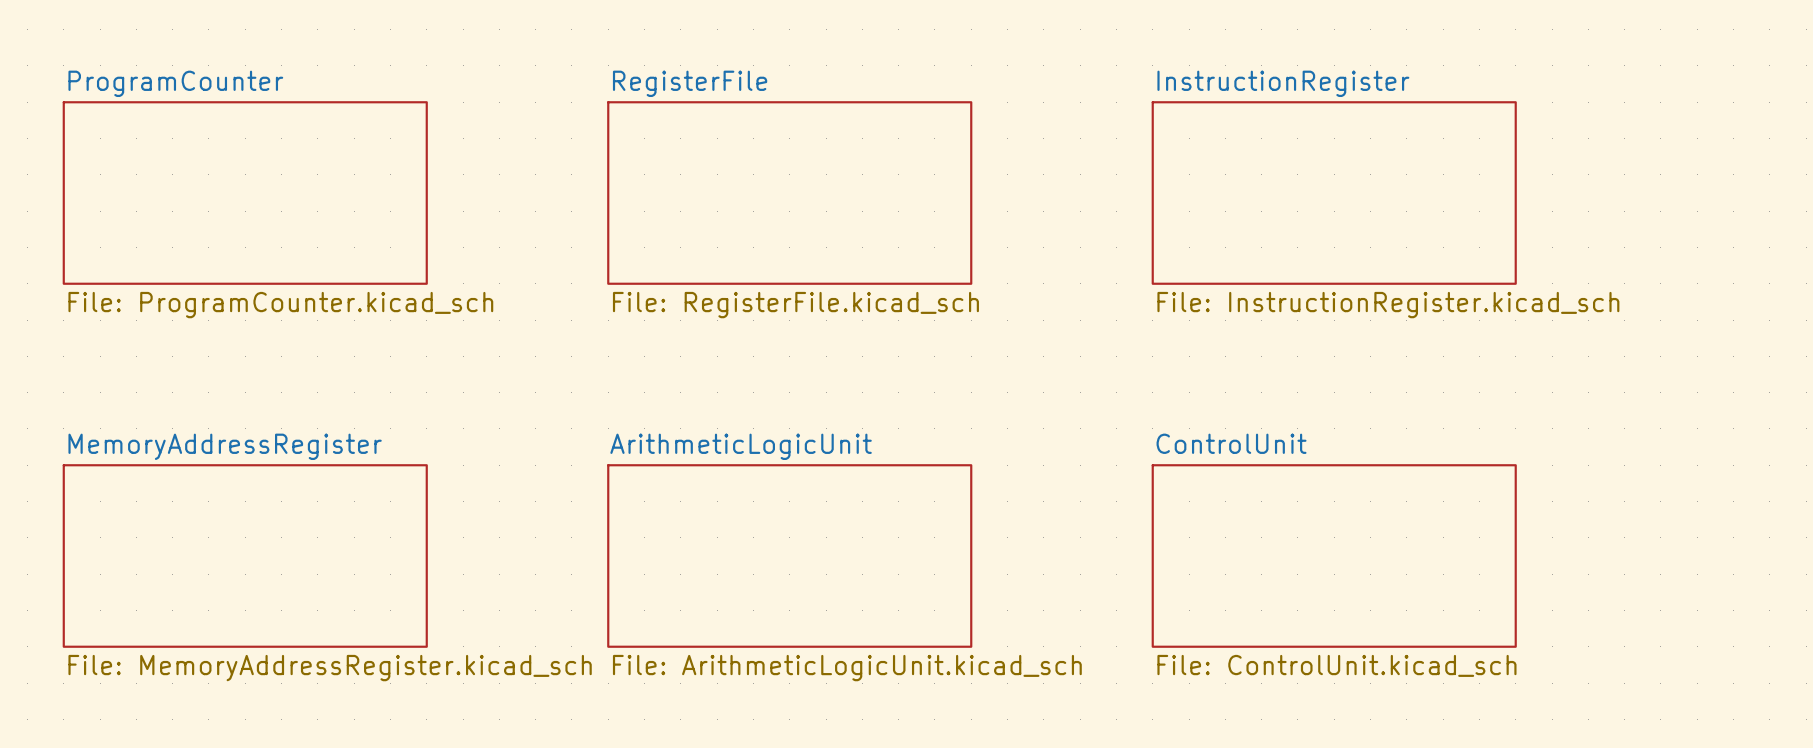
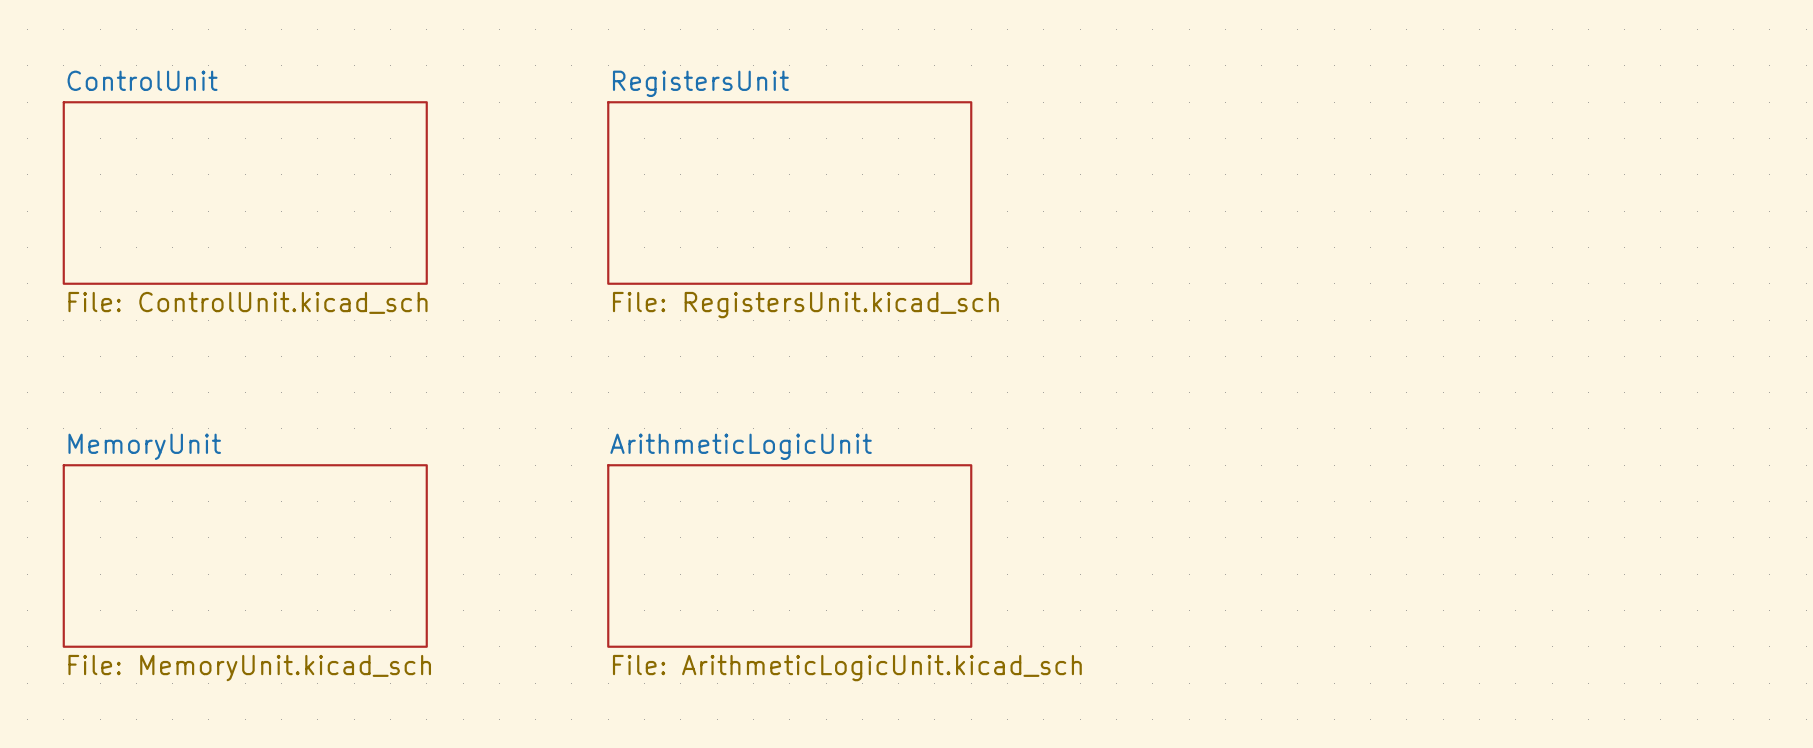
sheet ProgramCounter name: ProgramCounter (175, 83) -> ControlUnit (142, 80)
sheet RegisterFile name: RegisterFile (690, 83) -> RegistersUnit (700, 83)
sheet InstructionRegister: File: InstructionRegister.kicad_sch (1334, 193) -> none
sheet ProgramCounter value: File: ProgramCounter.kicad_sch (280, 305) -> File: ControlUnit.kicad_sch (247, 302)
sheet RegisterFile value: File: RegisterFile.kicad_sch (795, 305) -> File: RegistersUnit.kicad_sch (805, 305)
sheet MemoryAddressRegister name: MemoryAddressRegister (225, 446) -> MemoryUnit (144, 446)
sheet ControlUnit: File: ControlUnit.kicad_sch (1334, 555) -> none
sheet MemoryAddressRegister value: File: MemoryAddressRegister.kicad_sch (330, 668) -> File: MemoryUnit.kicad_sch (249, 668)

